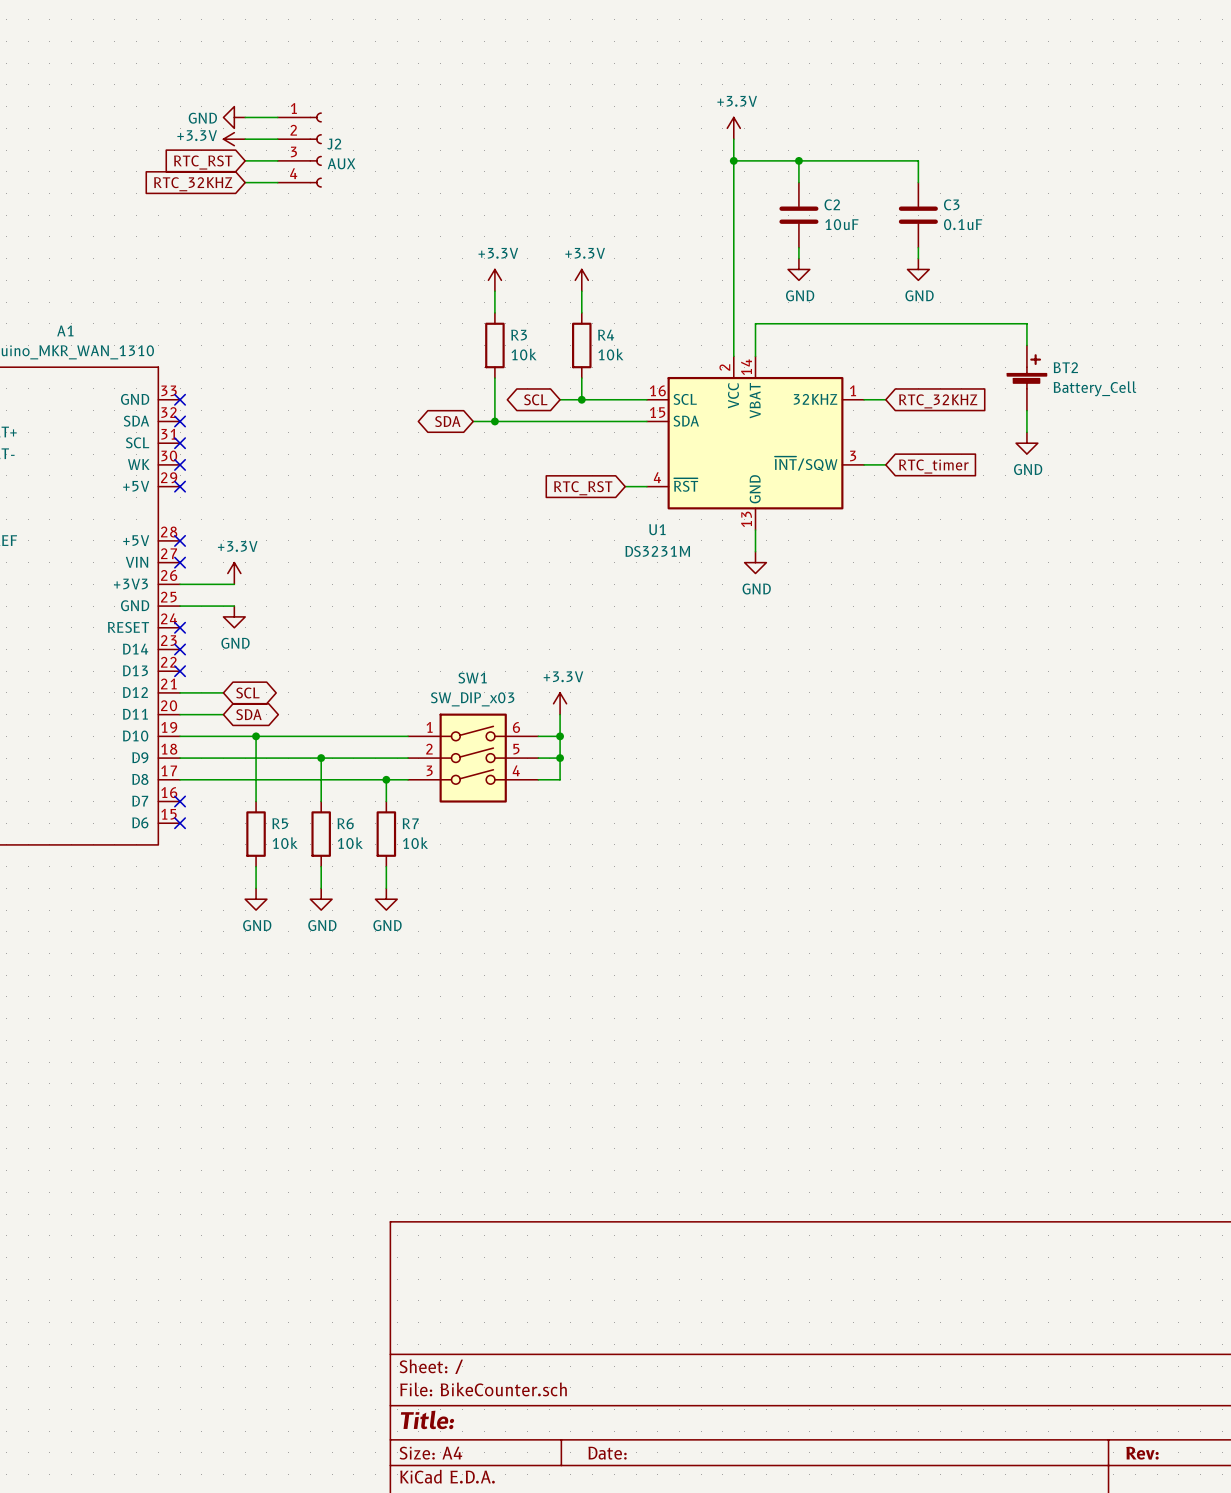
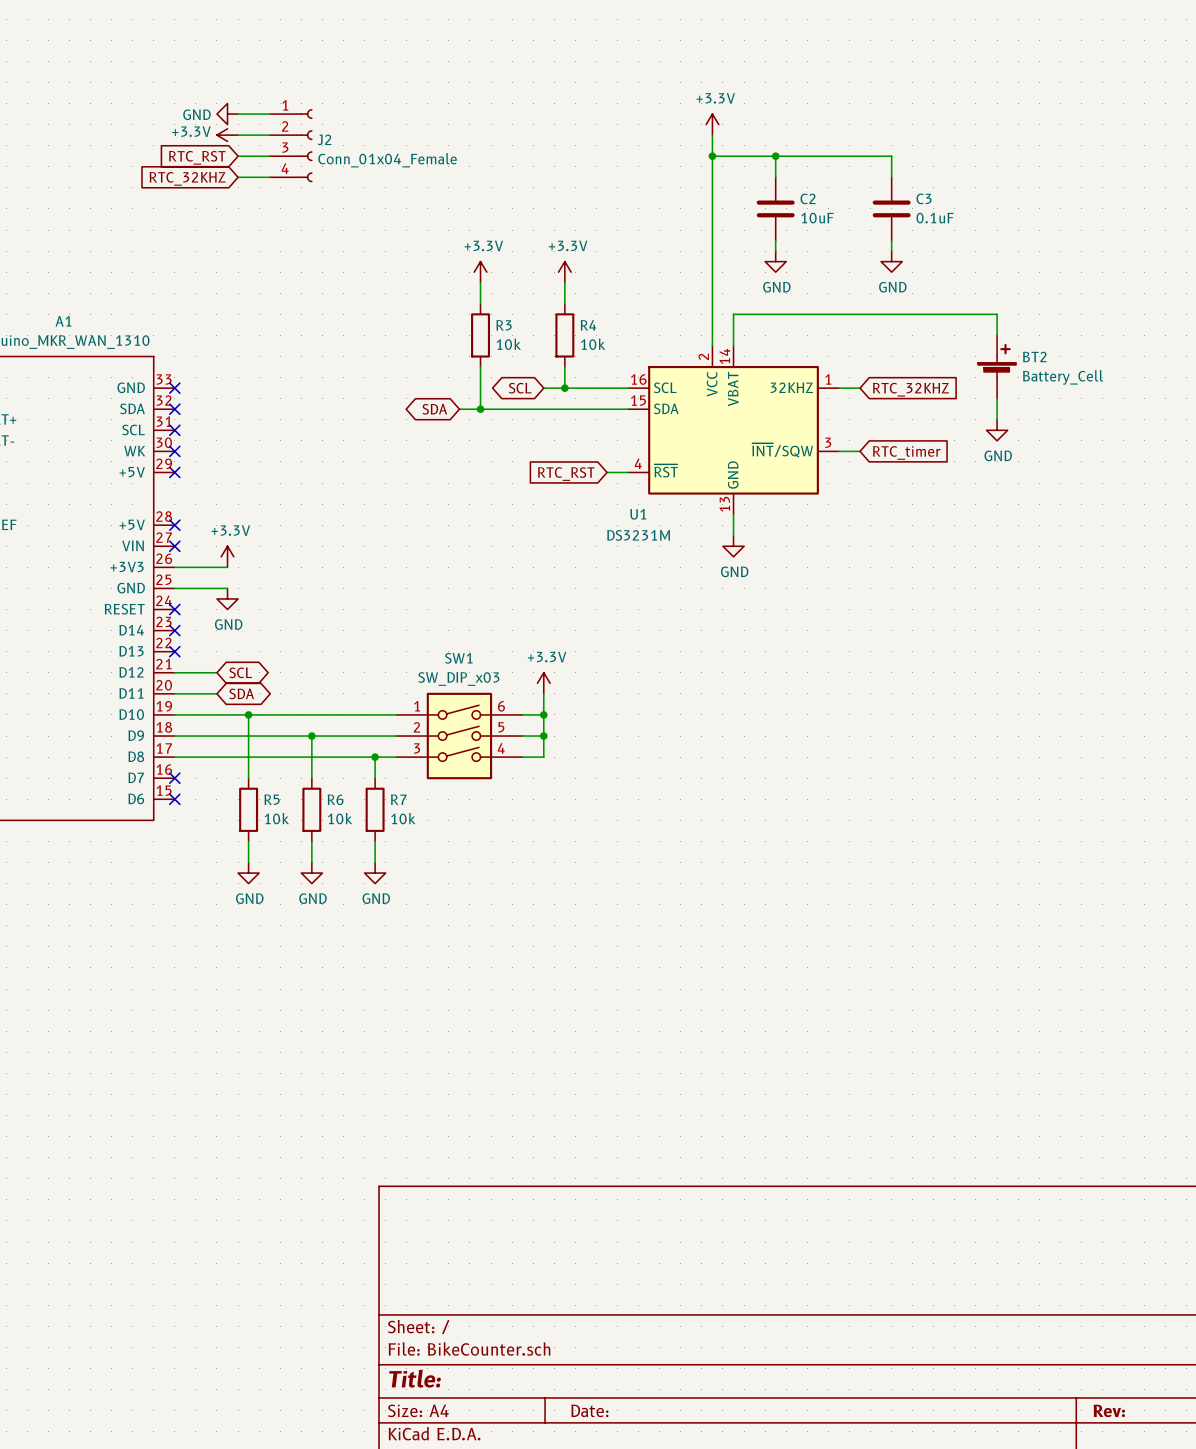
J2 value: AUX (341, 163) -> Conn_01x04_Female (387, 160)

